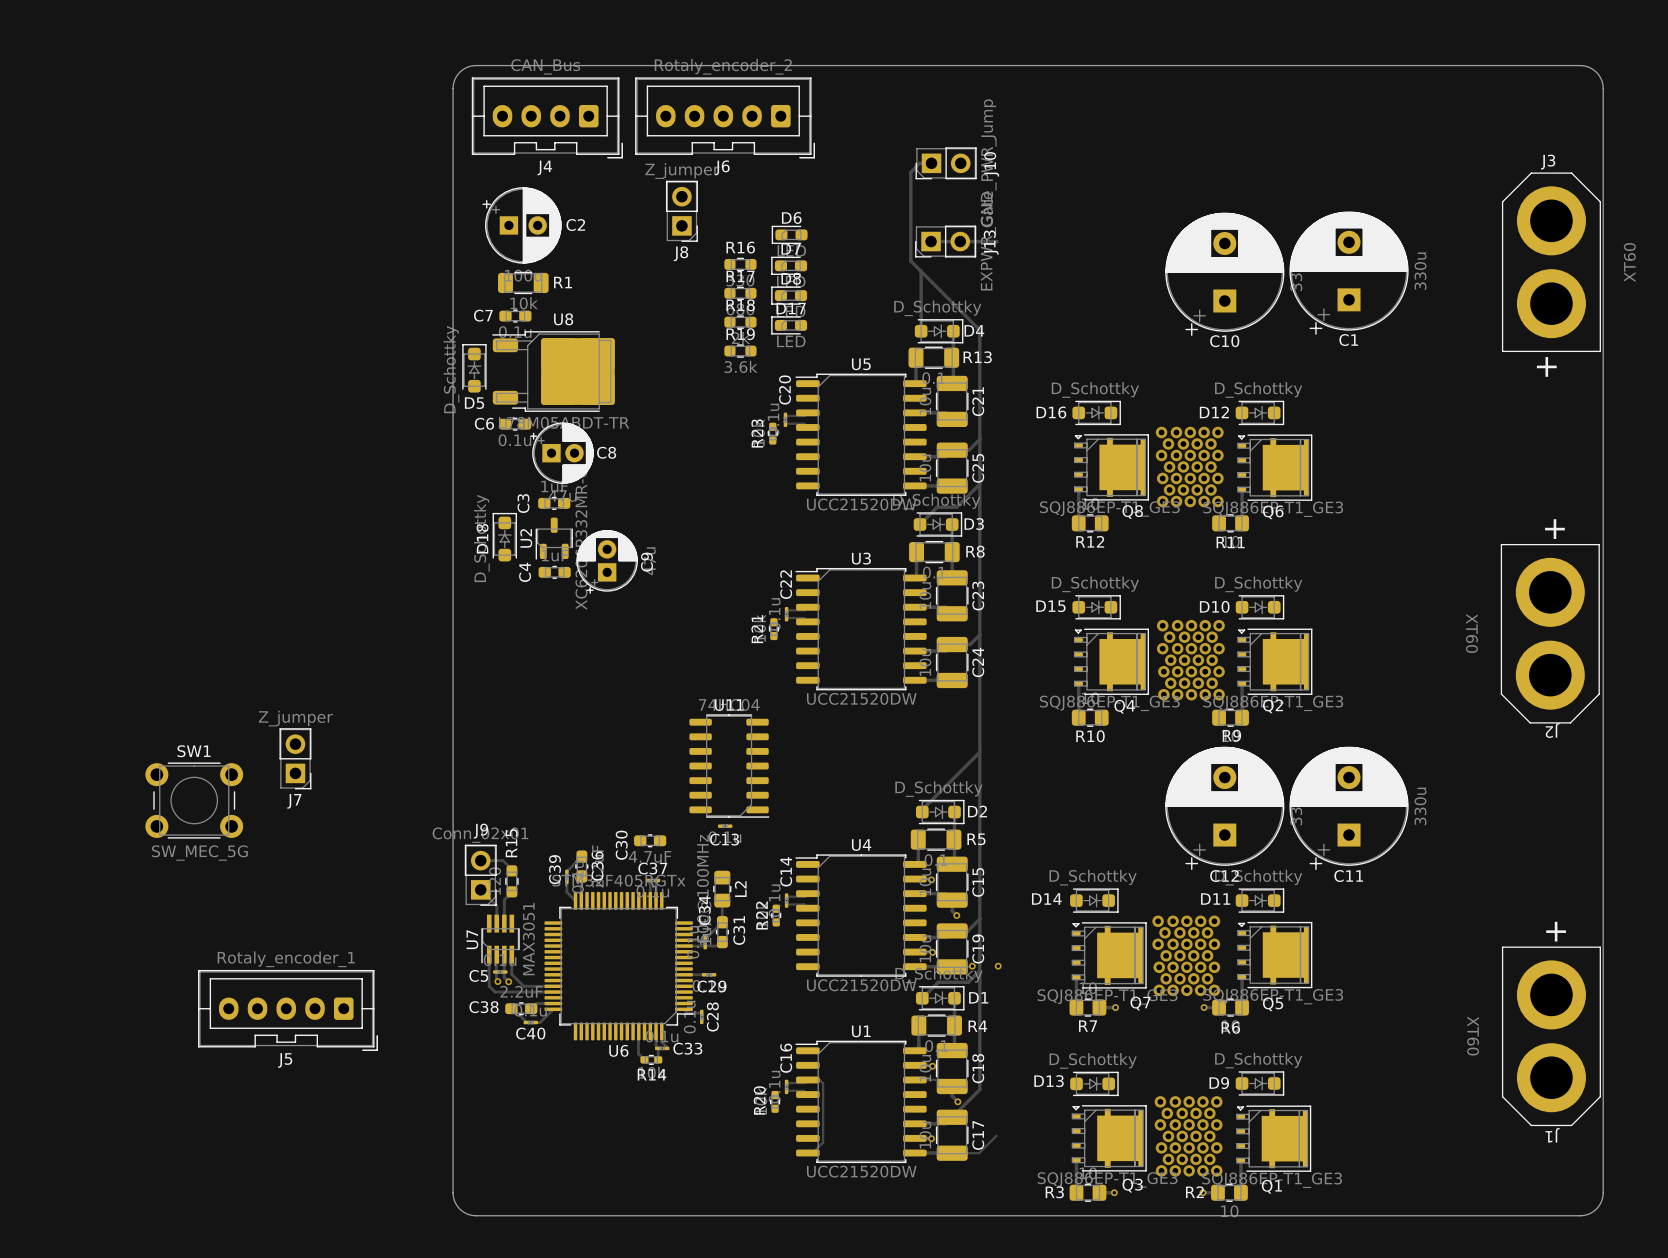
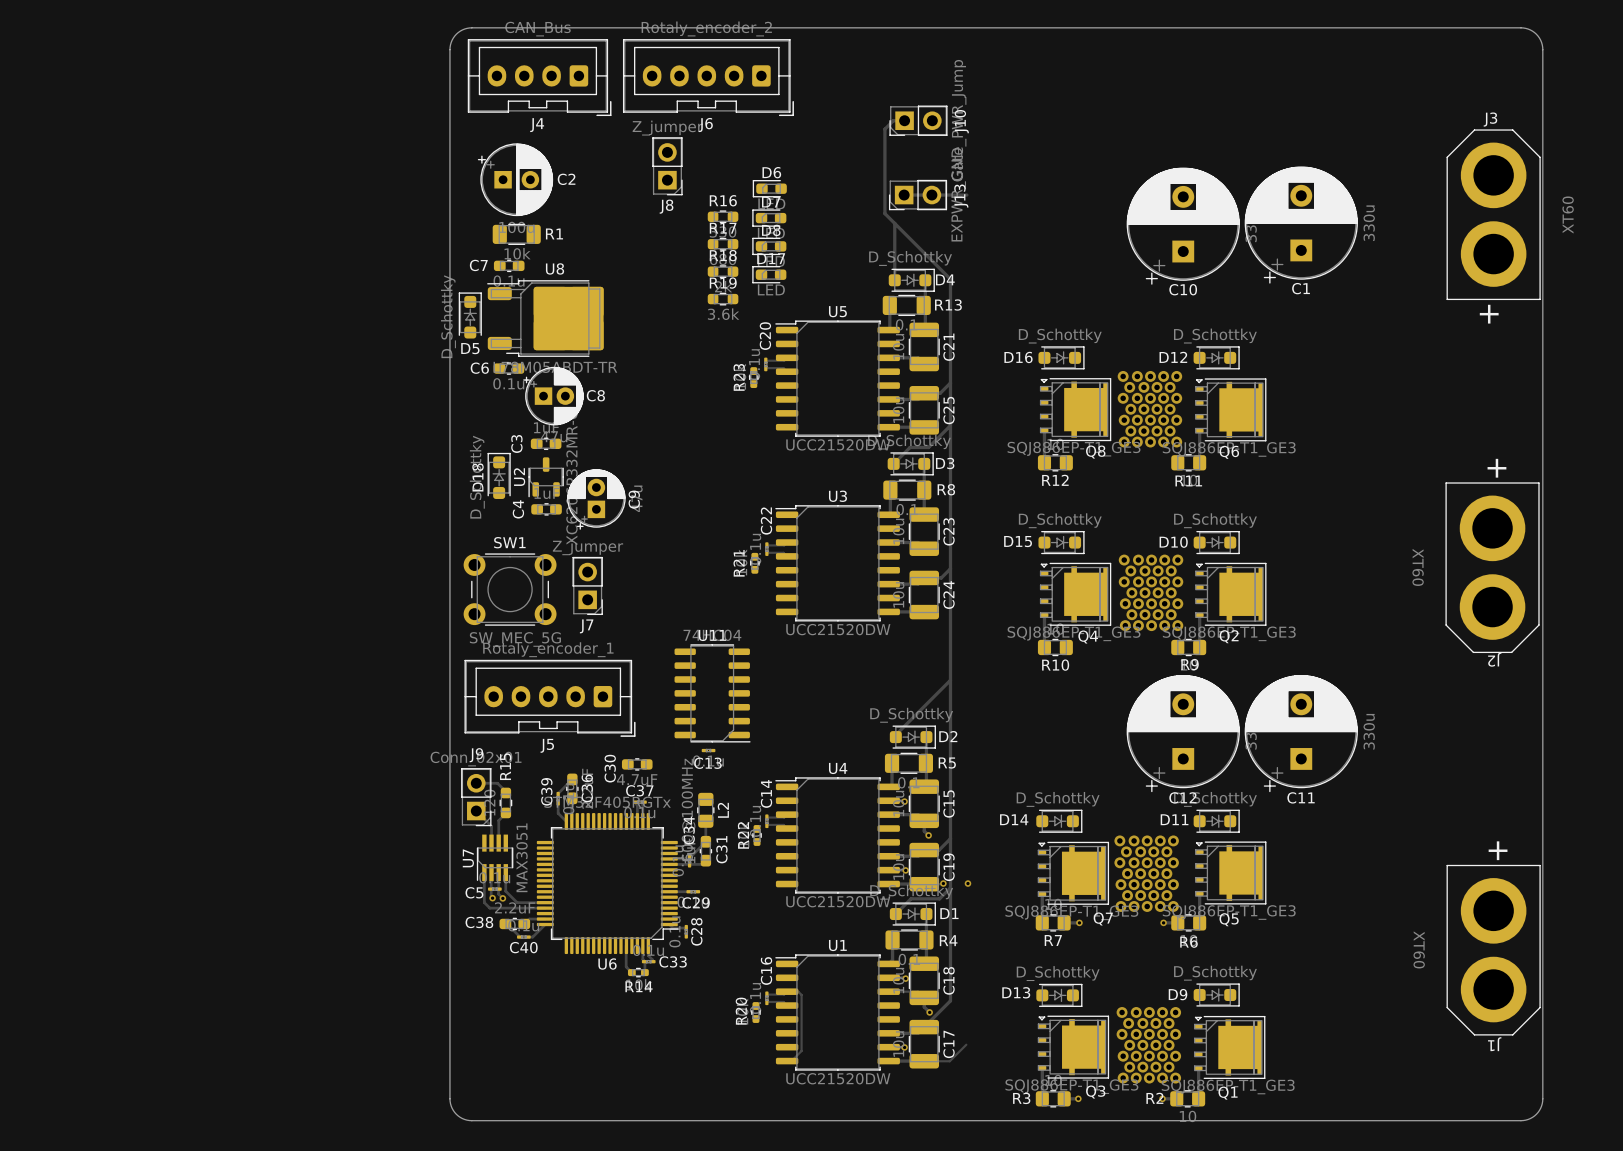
J7 position: (295, 758) -> (587, 585)
SW1 position: (194, 800) -> (510, 589)
J5 position: (287, 1010) -> (549, 698)

